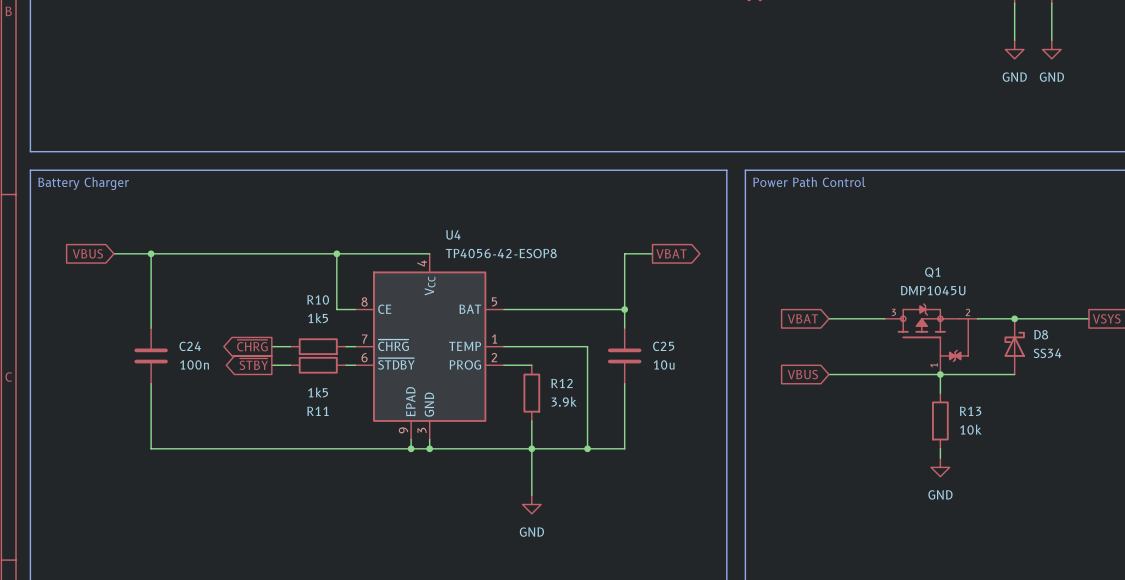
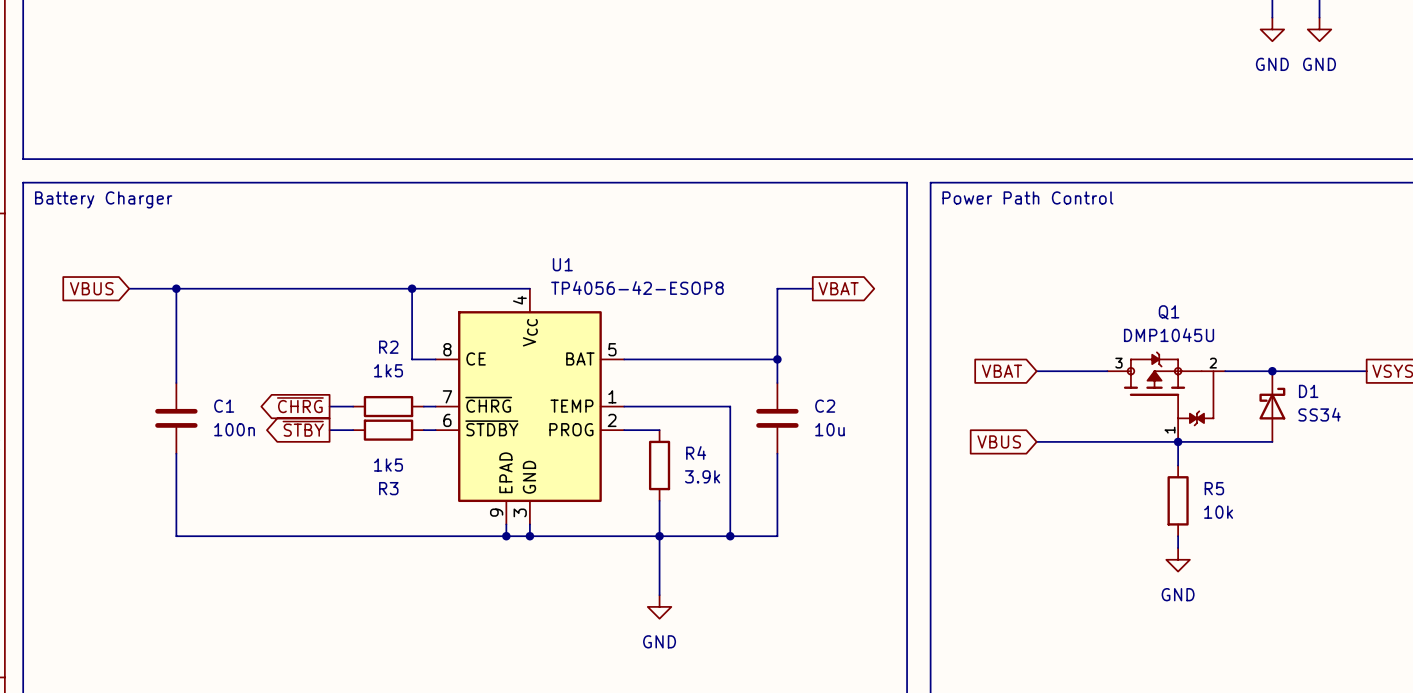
U4 name: U4 (453, 234) -> U1 (562, 264)
R10 name: R10 (318, 299) -> R2 (388, 347)
D8 name: D8 (1041, 334) -> D1 (1308, 391)
C24 name: C24 (190, 346) -> C1 (224, 406)
C25 name: C25 (663, 346) -> C2 (825, 406)
R12 name: R12 (562, 383) -> R4 (696, 452)
R11 name: R11 (317, 411) -> R3 (388, 488)
R13 name: R13 (970, 411) -> R5 (1214, 488)

